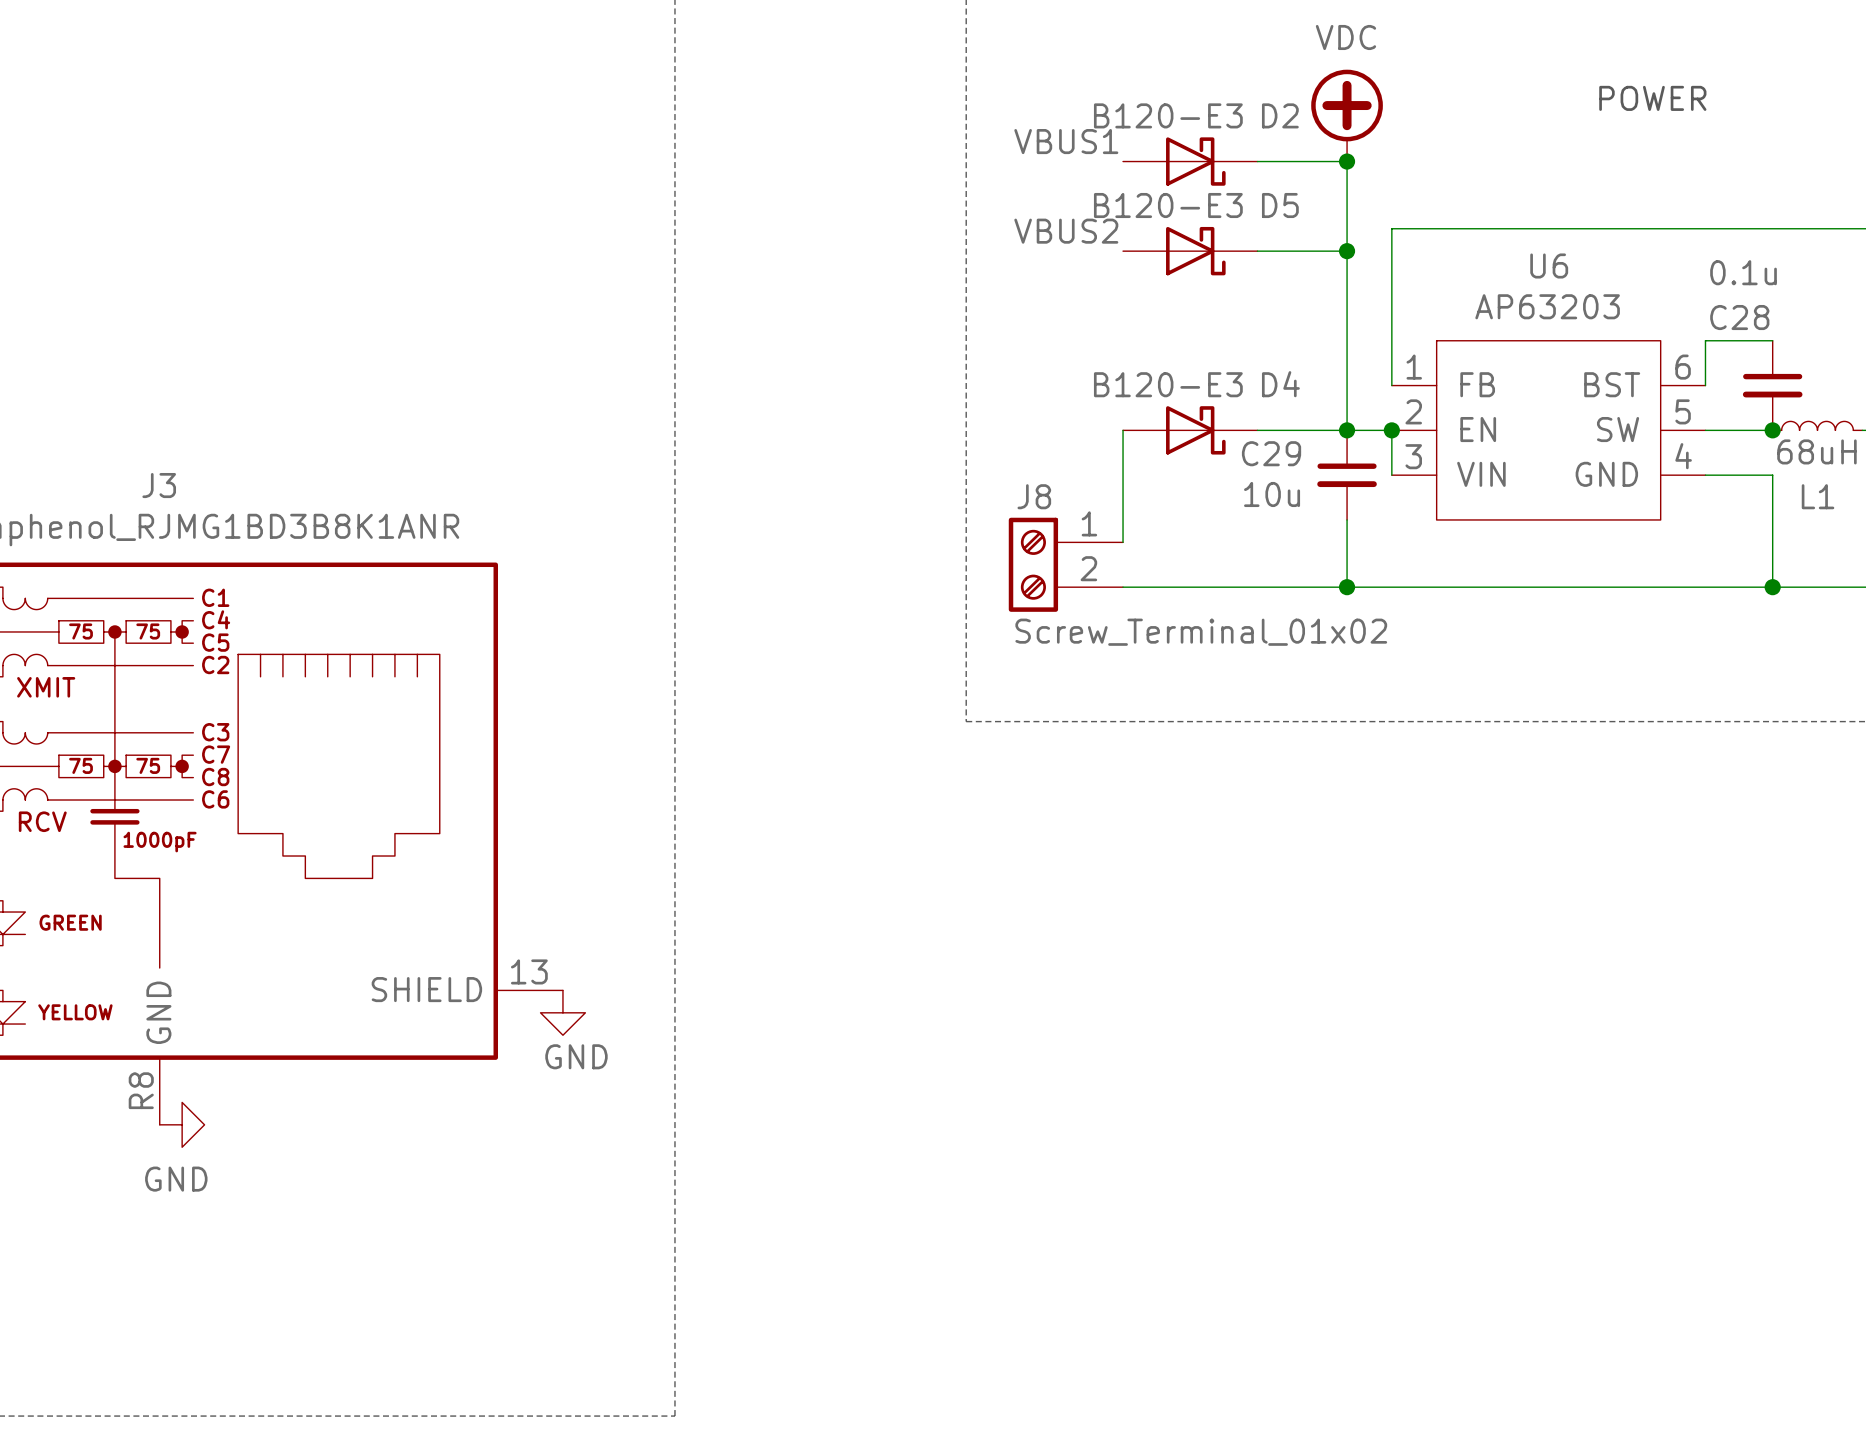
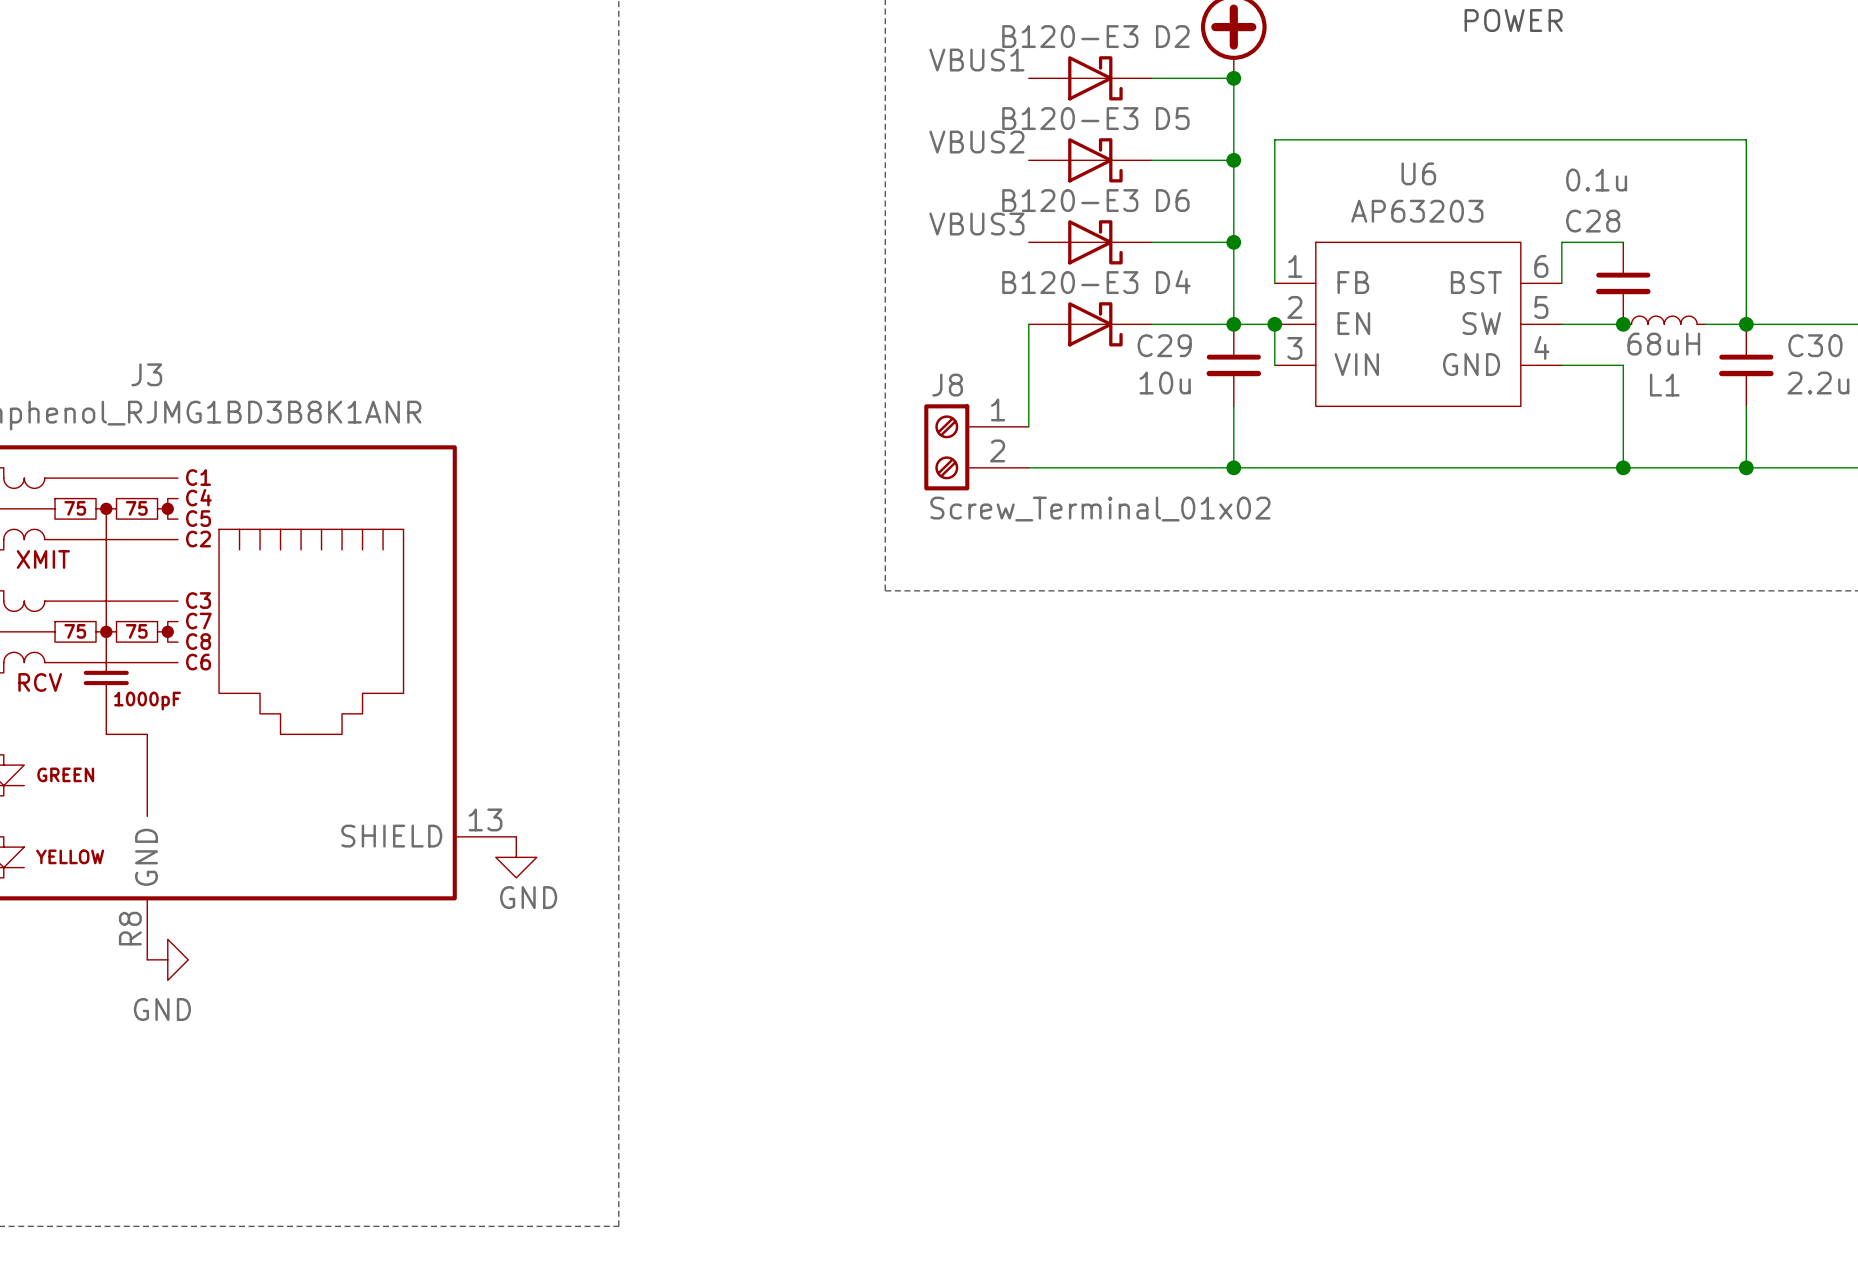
label: none -> VBUS3 (976, 224)
D6: none -> B120-E3 (1090, 242)
wire: none -> (1151, 242) (1233, 242)
junction: none -> (1233, 242)

